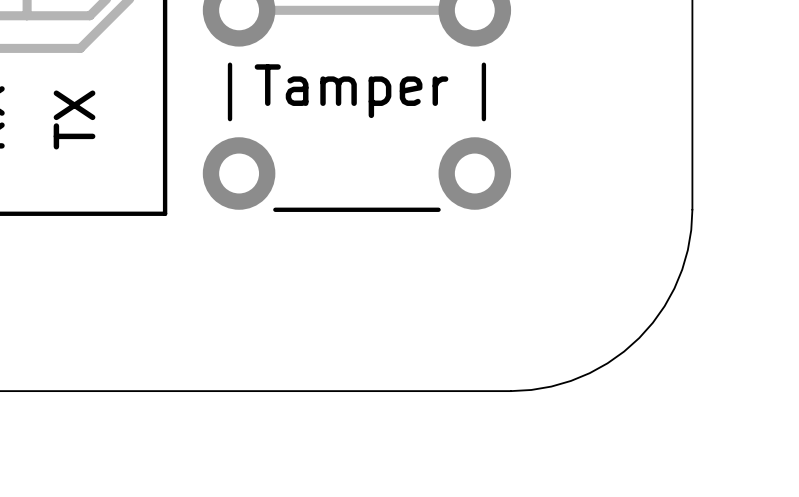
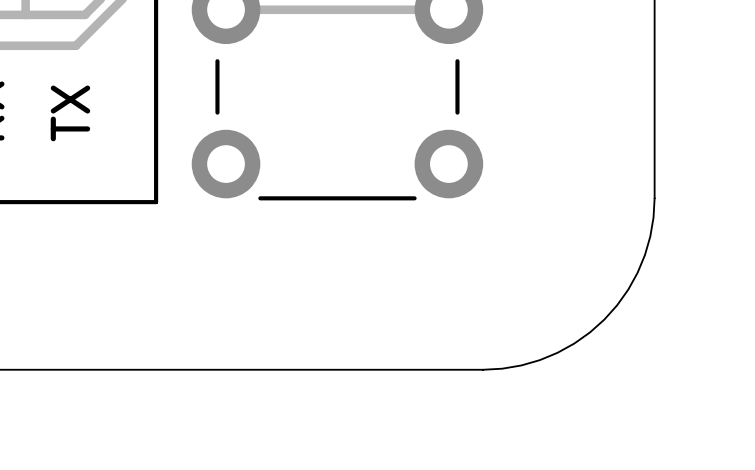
text: Tamper (351, 91) -> none

